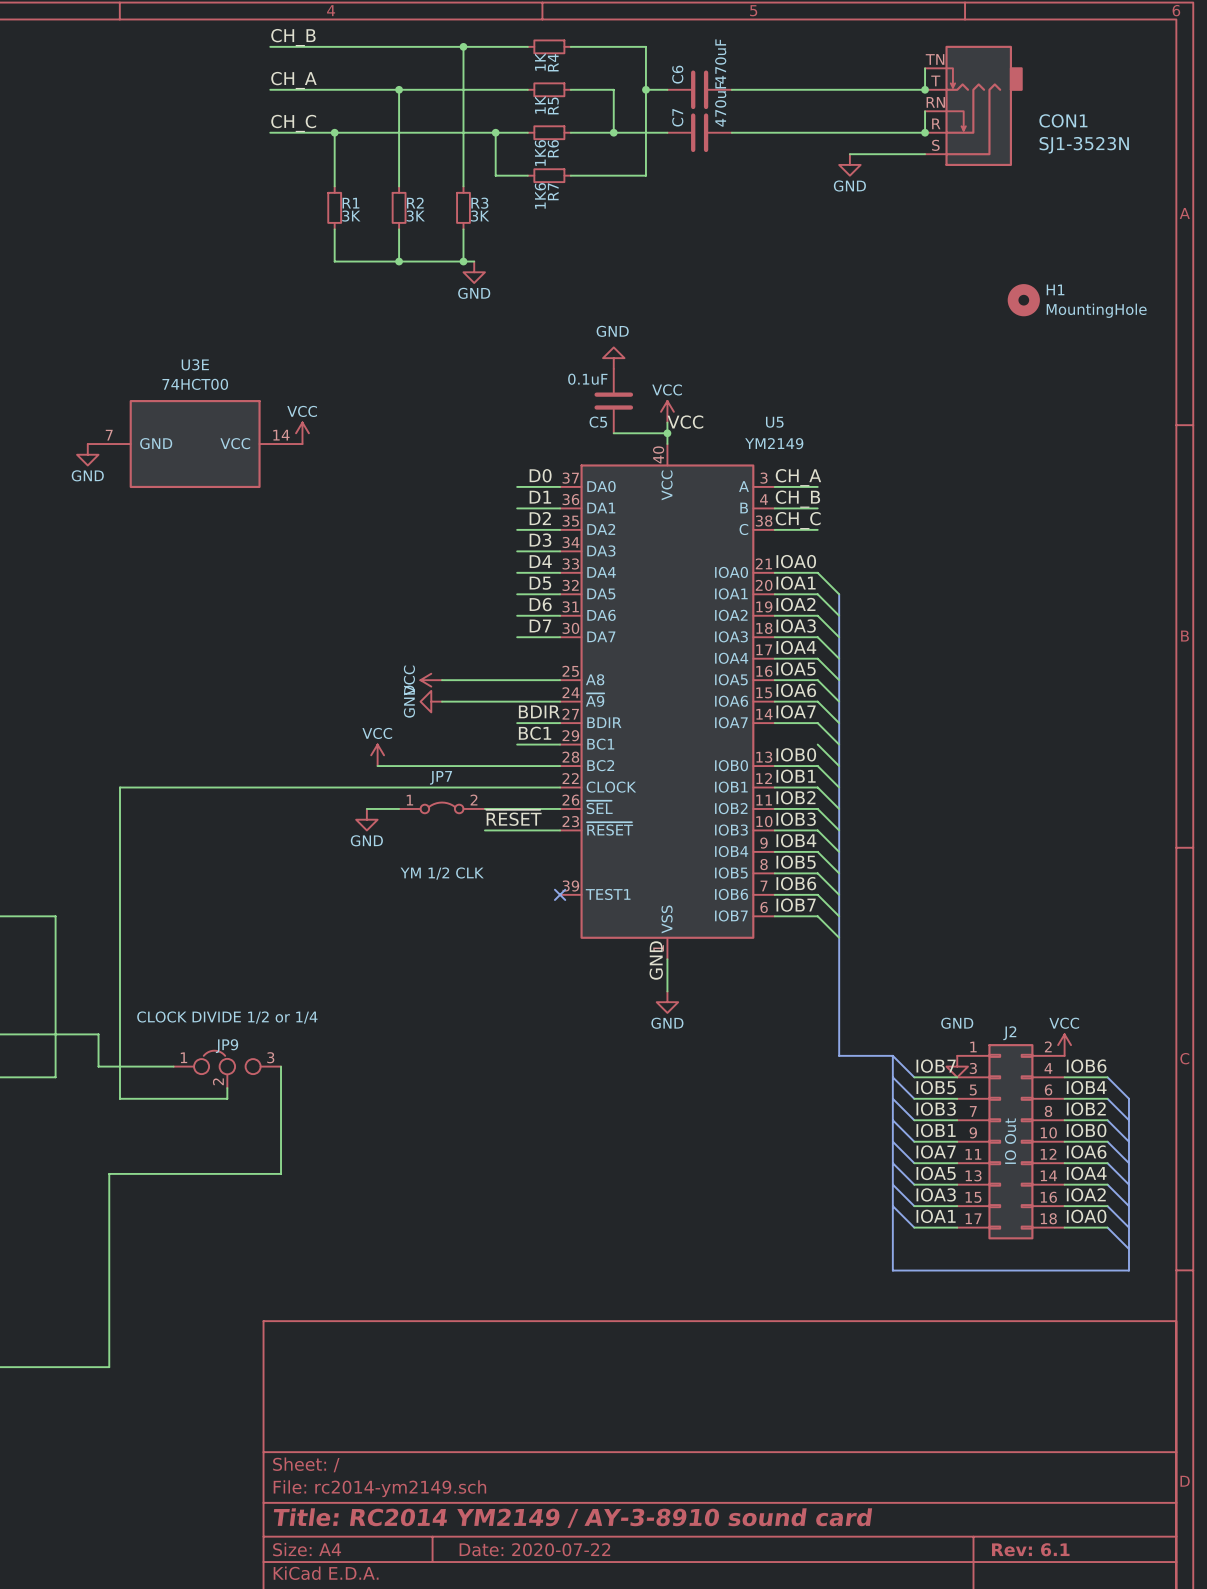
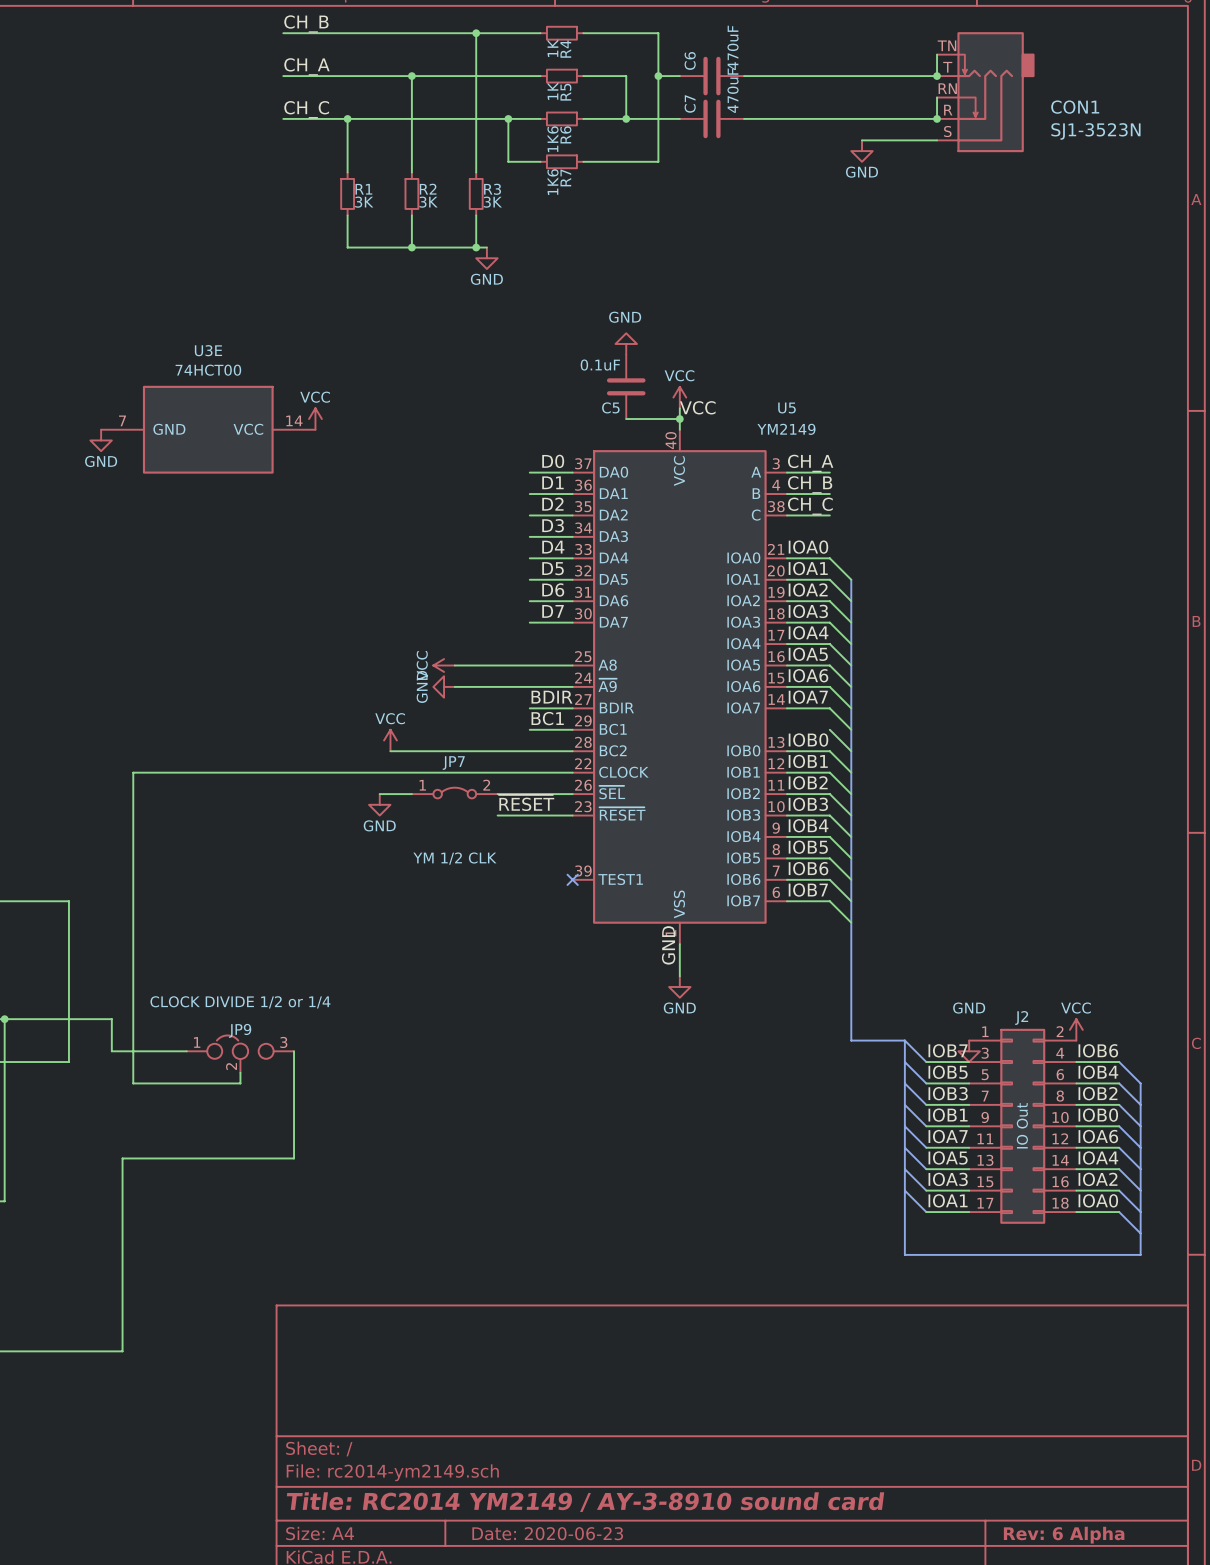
H1: MountingHole (1023, 300) -> none
title block: Date: 2020-07-22 (534, 1549) -> Date: 2020-06-23 (547, 1533)
title block: Rev: 6.1 (1030, 1549) -> Rev: 6 Alpha (1064, 1535)

